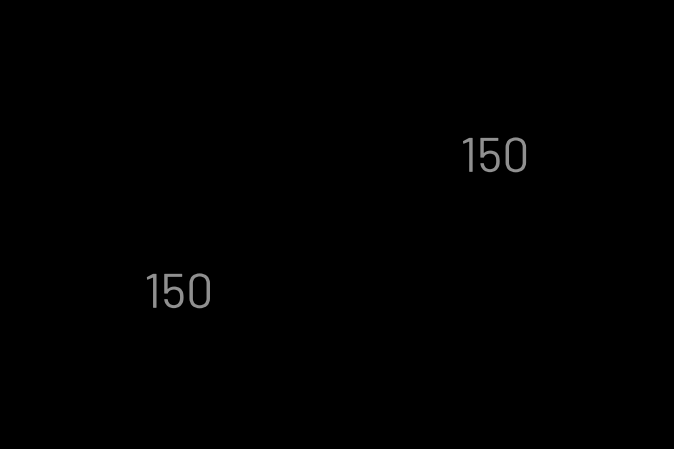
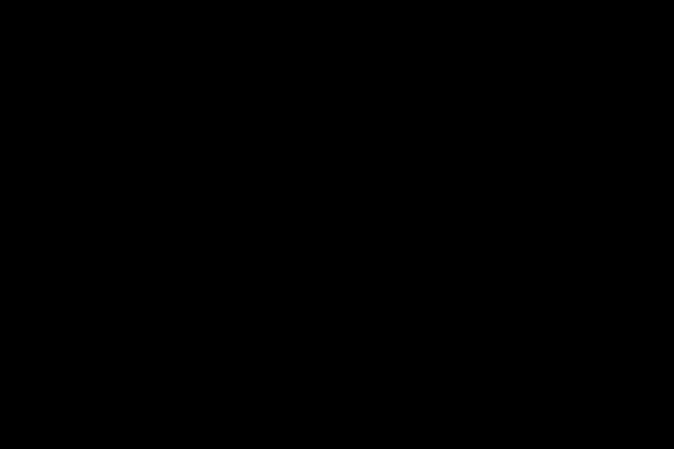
drawing: [462, 137, 527, 173] -> none
drawing: [146, 273, 210, 309] -> none

